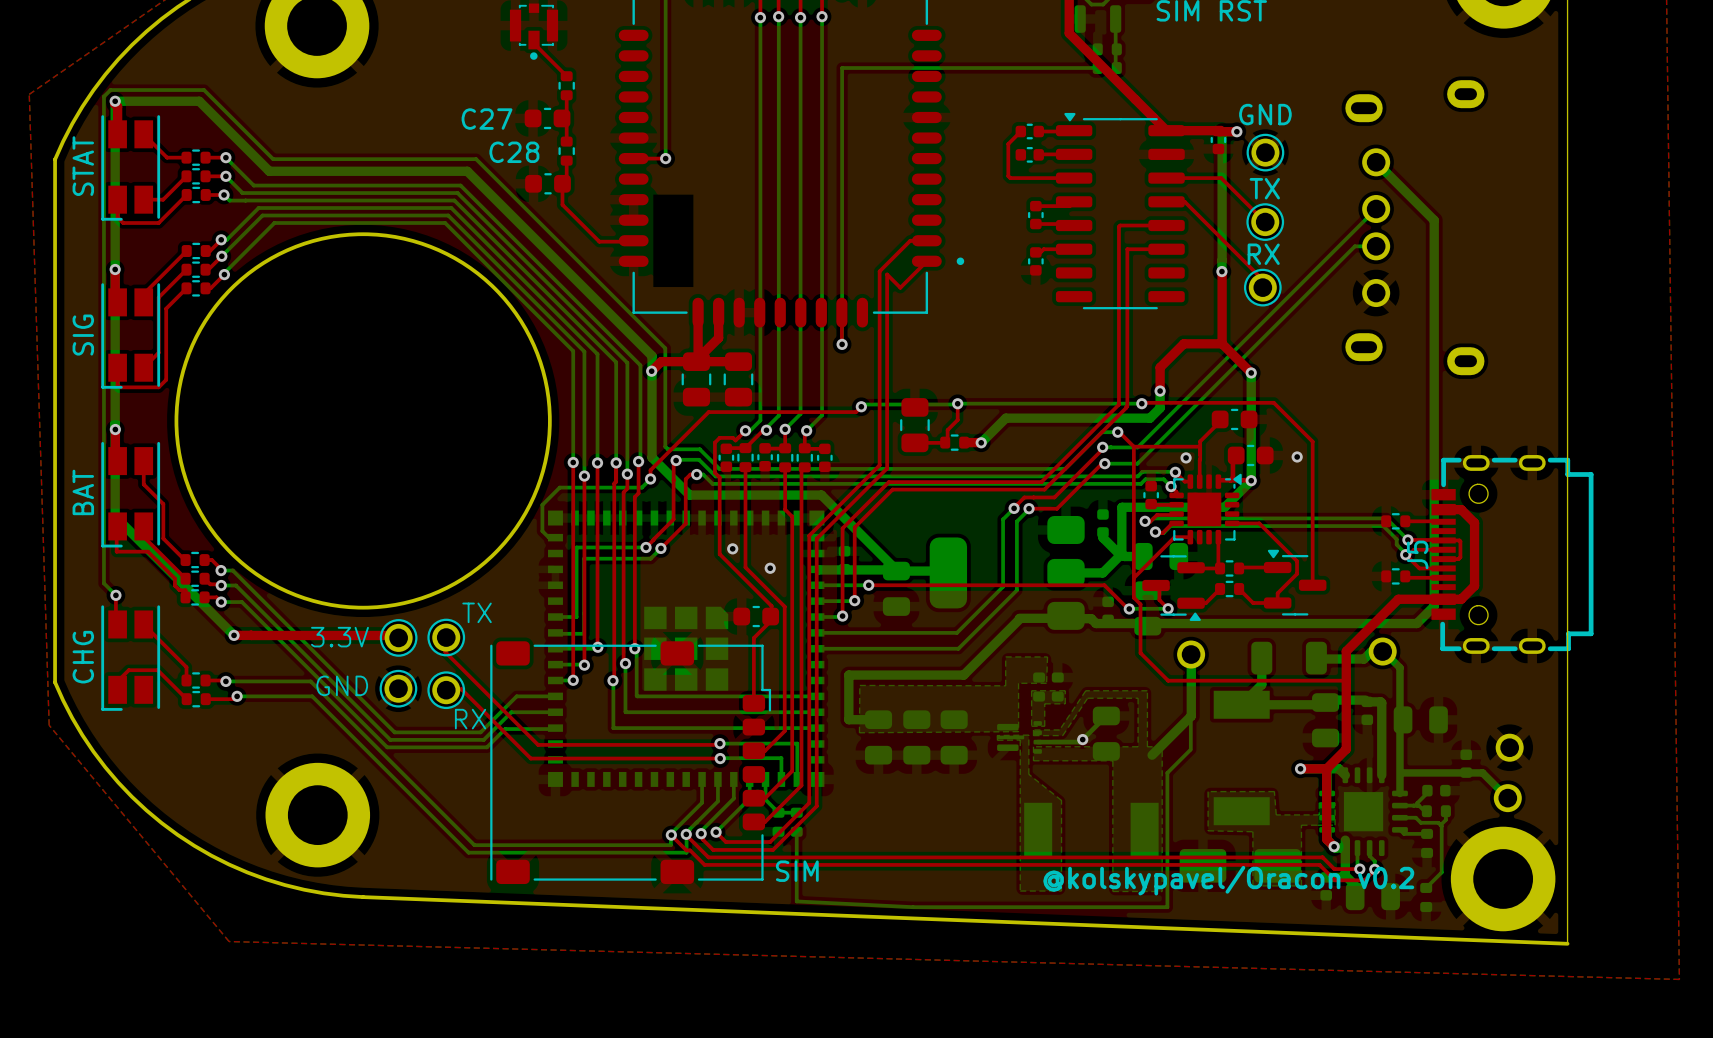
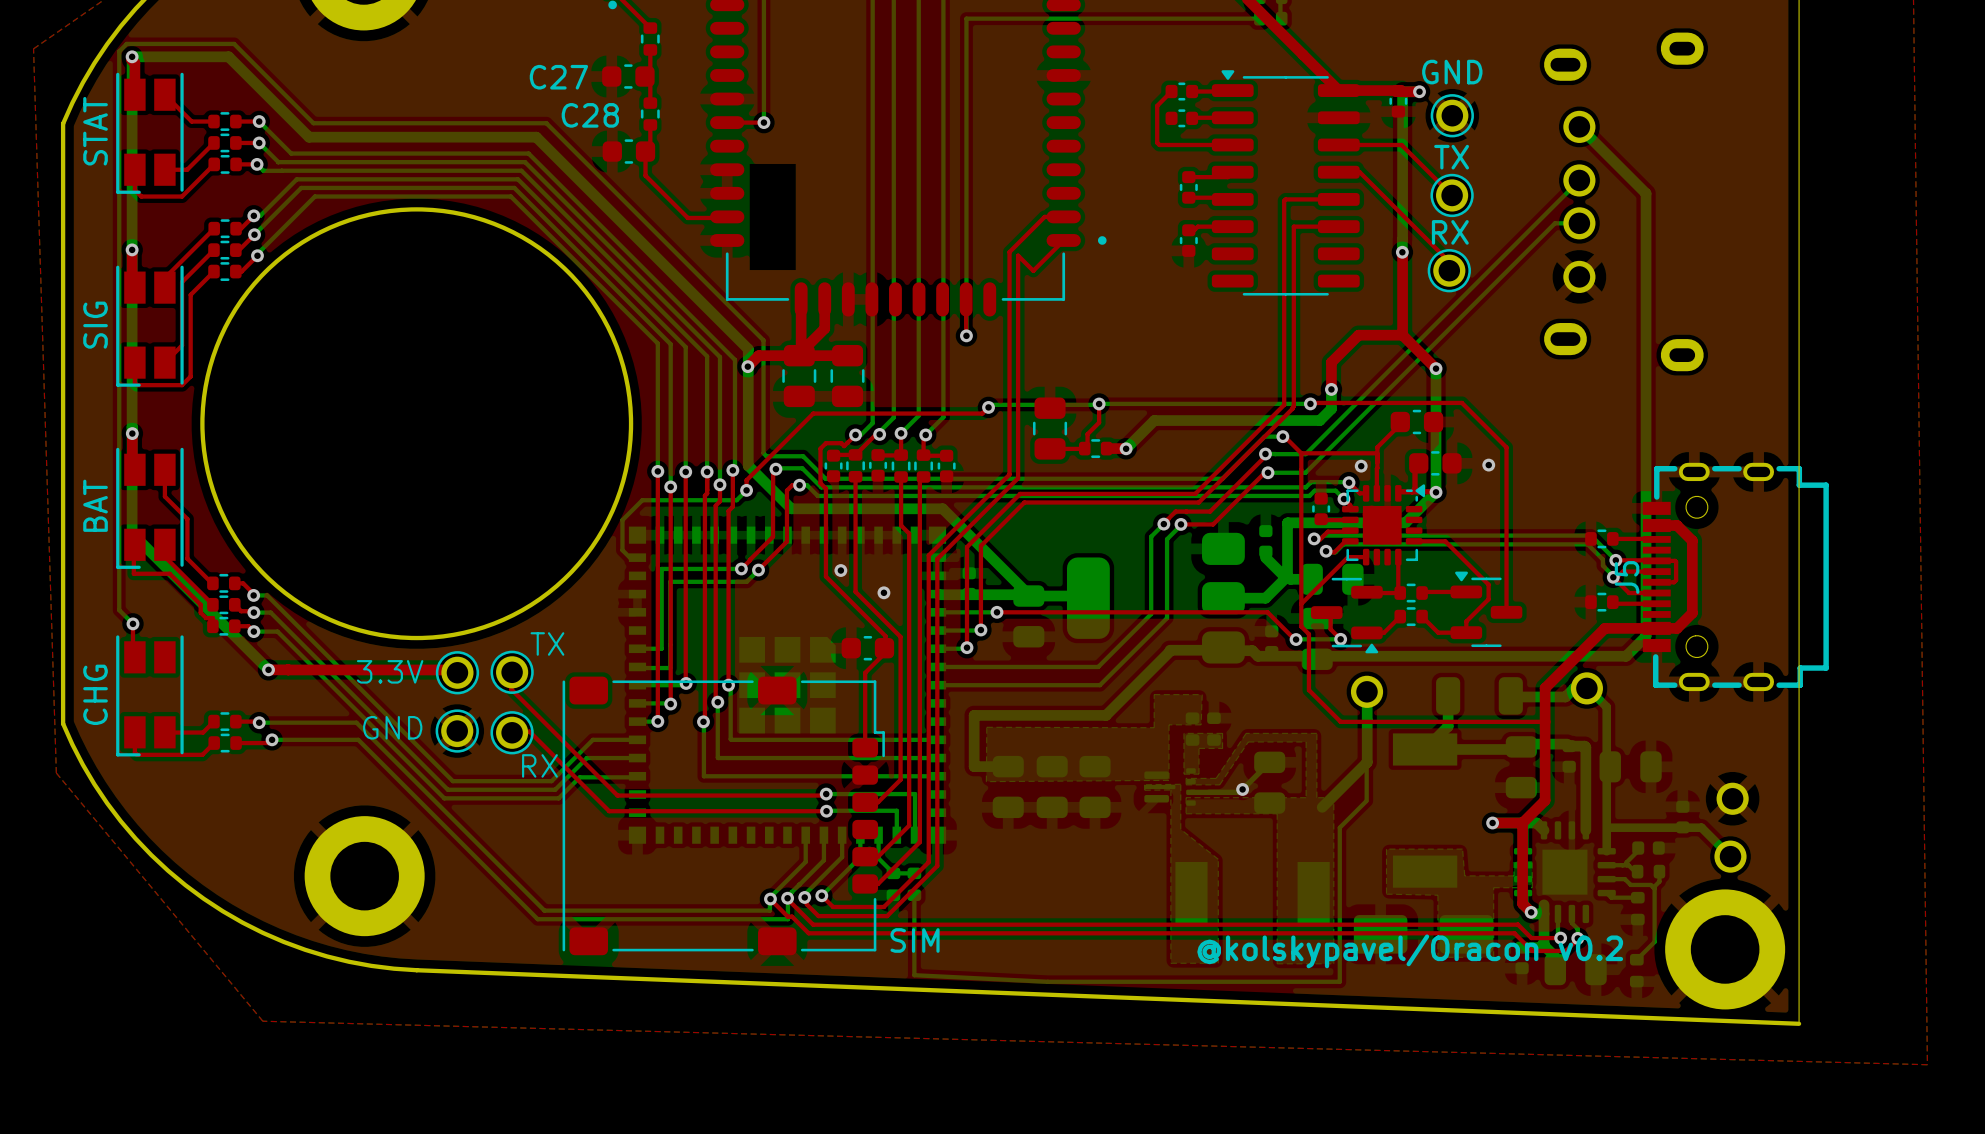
top track: (143, 624) (186, 667) (186, 680) -> (165, 732) (203, 732) (213, 721)
top track: (117, 681) (128, 670) (157, 670) (186, 699) -> (134, 732) (134, 752) (137, 754) (202, 754) (214, 743)

